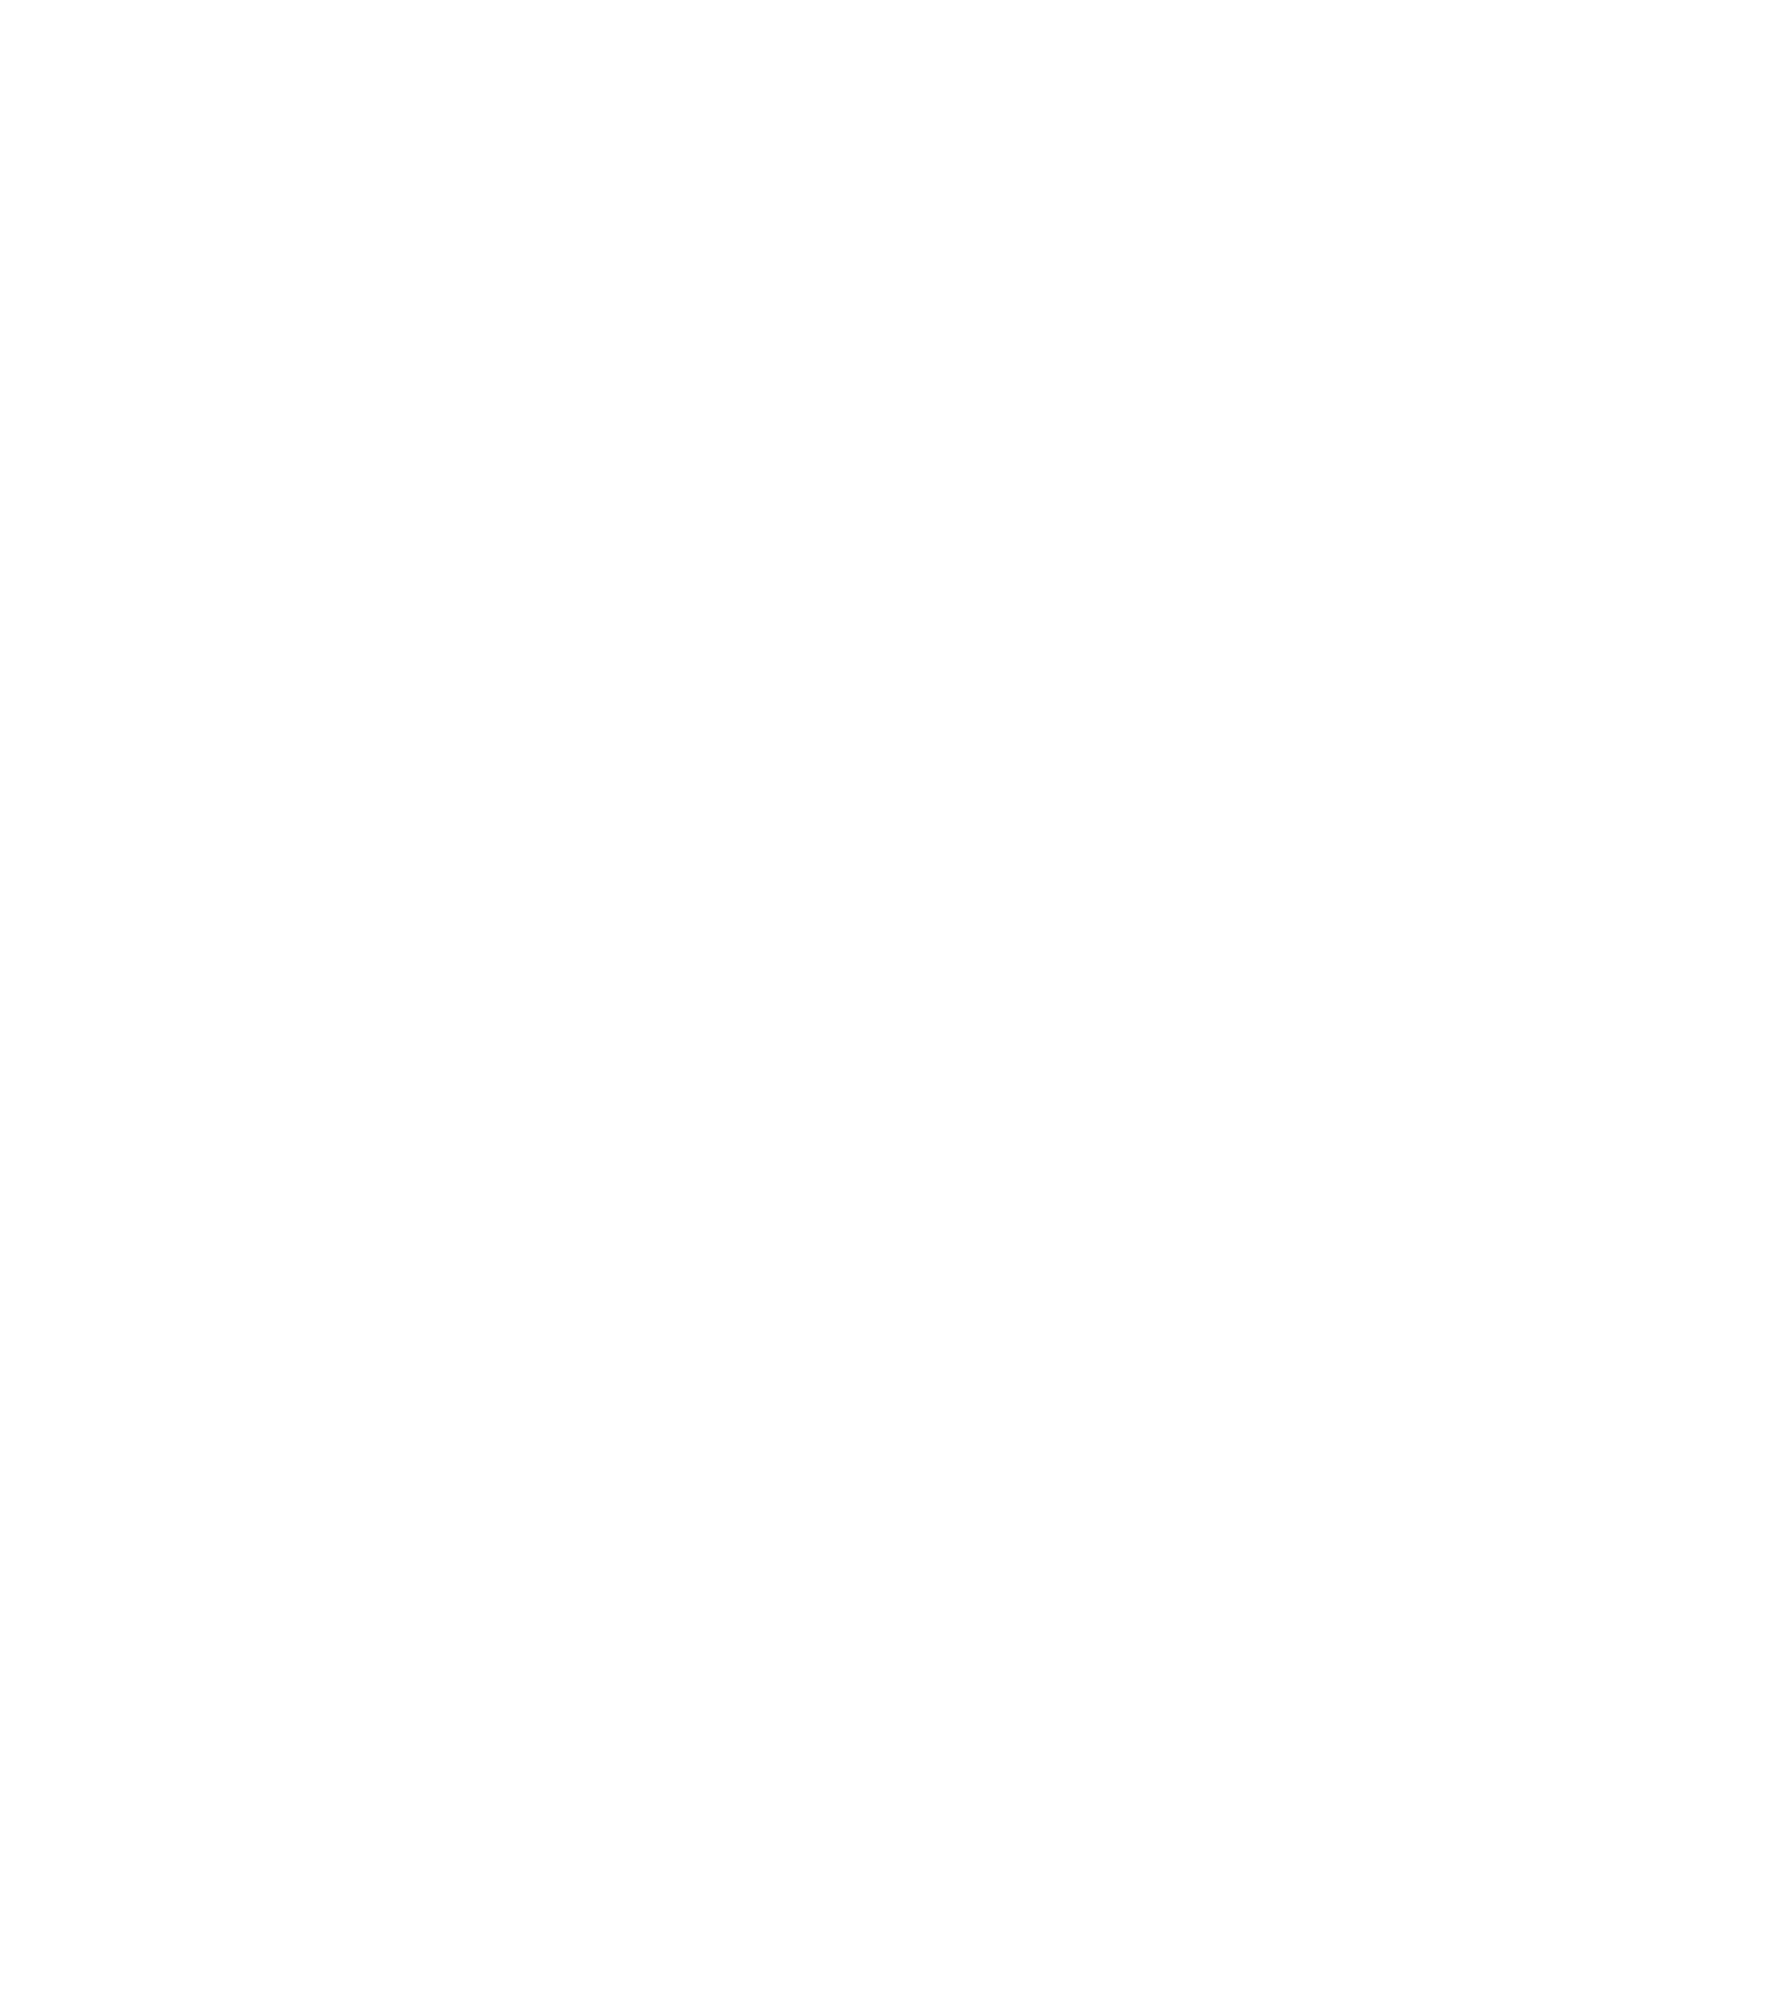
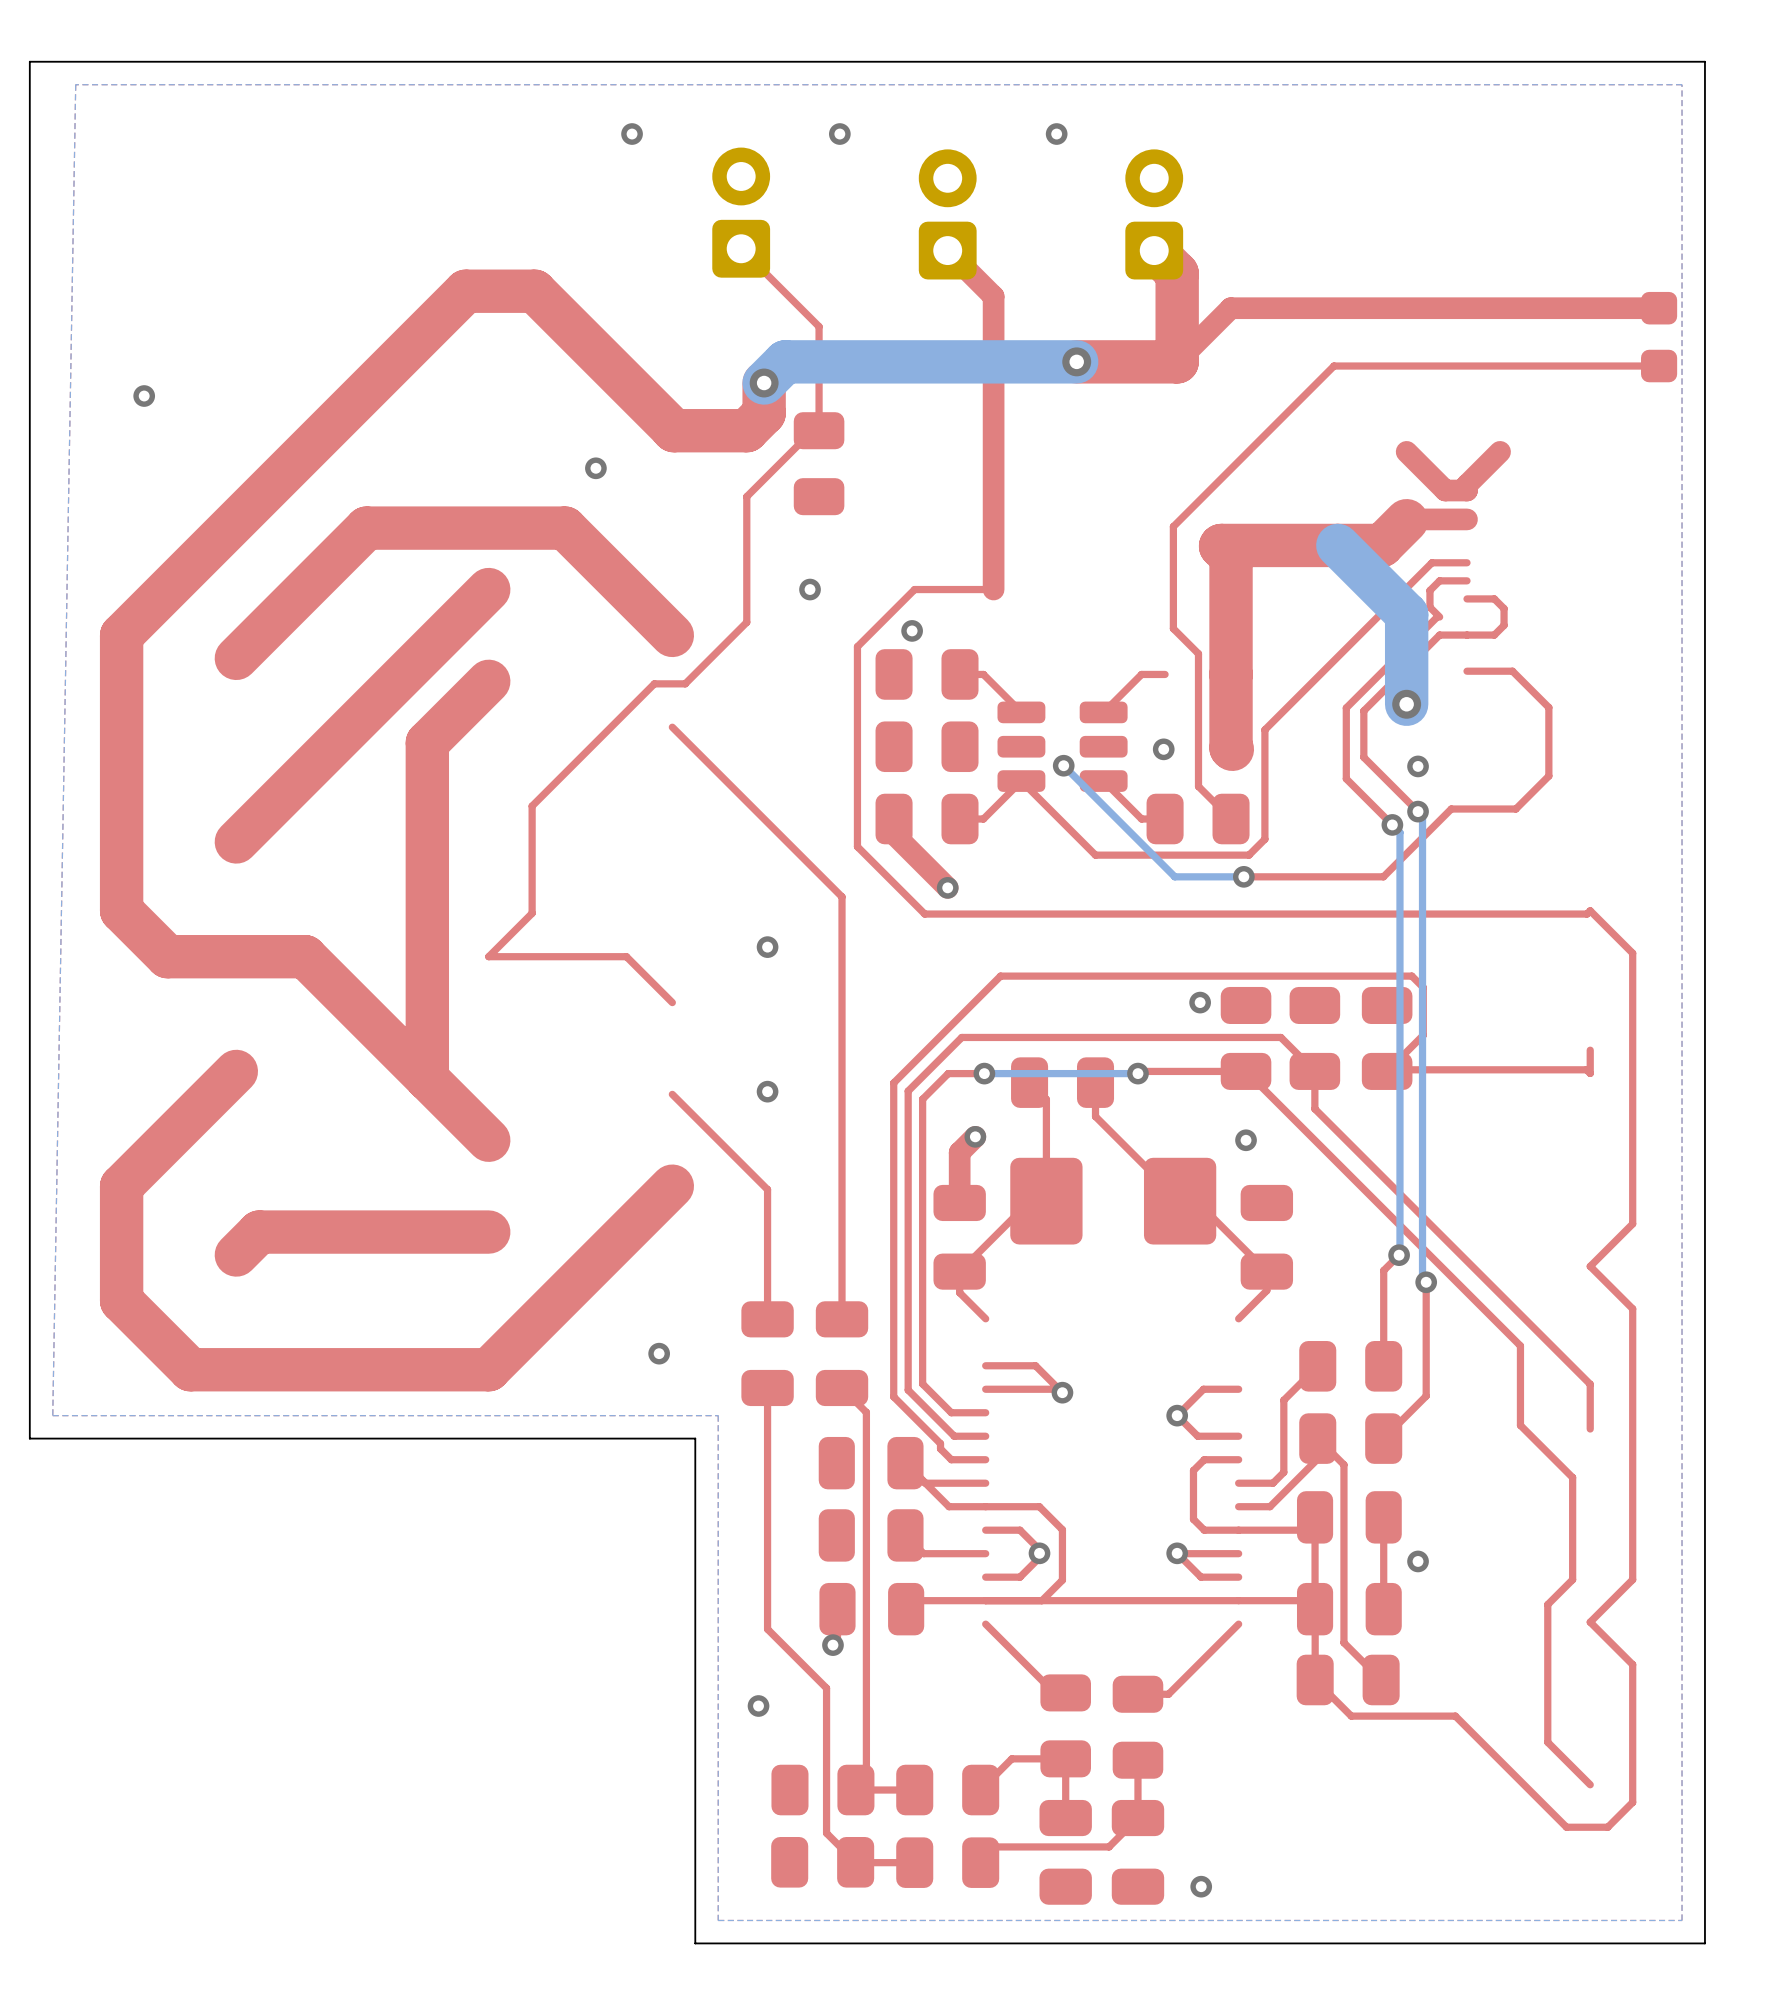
board edge: none -> (1704, 61) (29, 61) (29, 1438) (695, 1438) (695, 1943) (1704, 1943) (1704, 61)
bottom zone outline: none -> (1682, 84) (75, 84) (52, 1415) (718, 1415) (718, 1920) (1682, 1920) (1682, 84)
via: none -> (632, 134)
via: none -> (839, 134)
via: none -> (1056, 134)
part: none -> (741, 212)
part: none -> (947, 214)
part: none -> (1154, 214)
top track: none -> (741, 248) (819, 326) (819, 430) (812, 430) (746, 496) (746, 622) (685, 683) (654, 683) (532, 806) (532, 913) (488, 956) (626, 956) (672, 1002)
top track: none -> (947, 250) (993, 296) (993, 589) (914, 589) (857, 646) (857, 846) (924, 914) (1586, 914) (1590, 910) (1632, 953) (1632, 1223) (1590, 1266) (1632, 1308) (1632, 1579) (1590, 1622) (1632, 1664) (1632, 1802) (1607, 1827) (1566, 1827) (1455, 1716) (1351, 1716) (1315, 1679) (1315, 1517) (1302, 1530) (1204, 1530) (1193, 1519) (1193, 1470) (1204, 1459) (1238, 1459)
top track: none -> (1154, 250) (1177, 273) (1177, 361)
top track: none -> (1659, 308) (1230, 308) (1177, 361)
part: none -> (1659, 337)
bottom track: none -> (1076, 361) (785, 361) (764, 383)
via: none -> (1076, 361)
top track: none -> (1177, 361) (1076, 361)
top track: none -> (1659, 366) (1334, 366) (1173, 526) (1173, 628) (1198, 653) (1198, 786) (1231, 819)
top track: none -> (764, 383) (764, 413) (746, 430) (673, 430) (534, 291) (465, 291) (121, 635) (121, 910) (167, 956) (305, 956) (488, 1140)
via: none -> (764, 383)
via: none -> (144, 396)
top track: none -> (1500, 451) (1467, 484) (1467, 490) (1445, 490) (1406, 451)
part: none -> (819, 463)
via: none -> (595, 468)
top track: none -> (1467, 519) (1407, 519) (1381, 545) (1221, 545) (1231, 556) (1232, 749)
bottom track: none -> (1337, 545) (1406, 614) (1406, 704)
top track: none -> (1467, 562) (1431, 562) (1264, 729) (1264, 839) (1249, 855) (1095, 855) (1021, 781) (983, 819) (960, 819)
top track: none -> (1467, 580) (1439, 580) (1429, 590) (1429, 607) (1439, 617)
top track: none -> (488, 589) (236, 841)
via: none -> (810, 589)
top track: none -> (1467, 598) (1494, 598) (1504, 608) (1504, 625) (1494, 635) (1439, 635) (1363, 710) (1363, 757) (1418, 811)
top track: none -> (1437, 617) (1346, 707) (1346, 778) (1392, 824)
via: none -> (912, 630)
top track: none -> (672, 635) (565, 528) (366, 528) (236, 658)
top track: none -> (1467, 671) (1512, 671) (1548, 707) (1548, 776) (1515, 809) (1451, 809) (1383, 876) (1243, 876)
part: none -> (927, 674)
top track: none -> (960, 674) (983, 674) (1021, 712)
top track: none -> (1165, 674) (1141, 674) (1103, 712)
top track: none -> (488, 681) (427, 742) (427, 1078)
via: none -> (1406, 704)
top track: none -> (672, 727) (842, 896) (842, 1319)
part: none -> (927, 746)
part: none -> (1062, 746)
via: none -> (1163, 749)
bottom track: none -> (1063, 765) (1174, 876) (1243, 876)
via: none -> (1063, 765)
via: none -> (1418, 766)
top track: none -> (1103, 781) (1141, 819) (1165, 819)
bottom track: none -> (1418, 811) (1422, 816) (1422, 1278) (1426, 1282)
via: none -> (1418, 811)
top track: none -> (894, 819) (894, 834) (947, 887)
part: none -> (927, 819)
part: none -> (1198, 819)
bottom track: none -> (1392, 824) (1399, 832) (1399, 1254)
via: none -> (1392, 824)
via: none -> (1243, 876)
via: none -> (947, 887)
via: none -> (767, 947)
via: none -> (1200, 1002)
part: none -> (1246, 1038)
part: none -> (1314, 1038)
part: none -> (1387, 1038)
top track: none -> (1590, 1050) (1590, 1073) (1586, 1069) (1388, 1069)
top track: none -> (236, 1071) (121, 1186) (121, 1300) (190, 1369) (488, 1369) (672, 1186)
top track: none -> (1387, 1071) (1423, 1035) (1423, 987) (1411, 976) (1000, 976) (893, 1082) (893, 1396) (940, 1443) (940, 1448) (951, 1459) (985, 1459)
top track: none -> (984, 1073) (948, 1073) (922, 1099) (922, 1384) (951, 1412) (985, 1412)
via: none -> (984, 1073)
top track: none -> (1137, 1073) (1140, 1071) (1246, 1071) (1520, 1345) (1520, 1425) (1572, 1477) (1572, 1579) (1547, 1604) (1547, 1742) (1590, 1784)
bottom track: none -> (1137, 1073) (984, 1073)
via: none -> (1137, 1073)
top track: none -> (1029, 1082) (1046, 1099) (1046, 1201) (1030, 1201) (959, 1271) (959, 1292) (985, 1318)
part: none -> (1062, 1082)
top track: none -> (1095, 1082) (1095, 1116) (1180, 1201) (1196, 1201) (1266, 1271) (1266, 1290) (1238, 1318)
via: none -> (767, 1091)
top track: none -> (672, 1094) (767, 1189) (767, 1319)
top track: none -> (975, 1136) (959, 1152) (959, 1202)
via: none -> (975, 1136)
via: none -> (1246, 1140)
part: none -> (1113, 1201)
top track: none -> (488, 1232) (259, 1232) (236, 1255)
part: none -> (959, 1237)
part: none -> (1266, 1237)
top track: none -> (1399, 1255) (1383, 1270) (1383, 1366)
via: none -> (1399, 1255)
top track: none -> (1426, 1282) (1426, 1396) (1383, 1438)
via: none -> (1426, 1282)
via: none -> (659, 1353)
part: none -> (767, 1353)
part: none -> (842, 1353)
top track: none -> (985, 1365) (1035, 1365) (1062, 1392)
top track: none -> (1317, 1366) (1283, 1400) (1283, 1472) (1272, 1483) (1238, 1483)
part: none -> (1350, 1366)
top track: none -> (767, 1387) (767, 1629) (826, 1688) (826, 1833) (856, 1862) (914, 1862)
top track: none -> (842, 1387) (866, 1412) (866, 1779) (855, 1790) (914, 1790)
top track: none -> (1059, 1389) (985, 1389)
top track: none -> (1238, 1389) (1203, 1389) (1177, 1415) (1197, 1436) (1238, 1436)
via: none -> (1062, 1392)
via: none -> (1177, 1415)
top track: none -> (1590, 1429) (1590, 1384) (1314, 1108) (1314, 1071) (1280, 1037) (961, 1037) (908, 1091) (908, 1390) (954, 1436) (985, 1436)
part: none -> (1350, 1438)
part: none -> (871, 1463)
top track: none -> (905, 1463) (949, 1506) (1039, 1506) (1062, 1529) (1062, 1580) (1041, 1600)
top track: none -> (985, 1483) (925, 1483)
top track: none -> (1238, 1506) (1270, 1506) (1317, 1458) (1317, 1438) (1343, 1464) (1343, 1642) (1381, 1679)
part: none -> (1349, 1517)
top track: none -> (1383, 1517) (1383, 1609)
top track: none -> (985, 1530) (1020, 1530) (1039, 1549) (1039, 1557) (1020, 1577) (985, 1577)
part: none -> (871, 1535)
top track: none -> (905, 1535) (923, 1553) (985, 1553)
via: none -> (1039, 1553)
top track: none -> (1177, 1553) (1201, 1577) (1238, 1577)
via: none -> (1177, 1553)
top track: none -> (1238, 1553) (1177, 1553)
via: none -> (1418, 1561)
part: none -> (871, 1609)
top track: none -> (1315, 1609) (1306, 1600) (914, 1600) (906, 1609)
part: none -> (1349, 1609)
top track: none -> (985, 1624) (1054, 1692) (1065, 1692)
top track: none -> (1238, 1624) (1168, 1694) (1137, 1694)
via: none -> (832, 1645)
part: none -> (1348, 1679)
via: none -> (758, 1706)
part: none -> (1065, 1725)
part: none -> (1137, 1727)
top track: none -> (1137, 1760) (1137, 1818) (1109, 1846) (996, 1846) (980, 1862)
part: none -> (822, 1790)
part: none -> (947, 1790)
top track: none -> (980, 1790) (1011, 1758) (1065, 1758) (1065, 1818)
part: none -> (1065, 1852)
part: none -> (1137, 1852)
part: none -> (822, 1862)
part: none -> (947, 1862)
via: none -> (1201, 1886)

